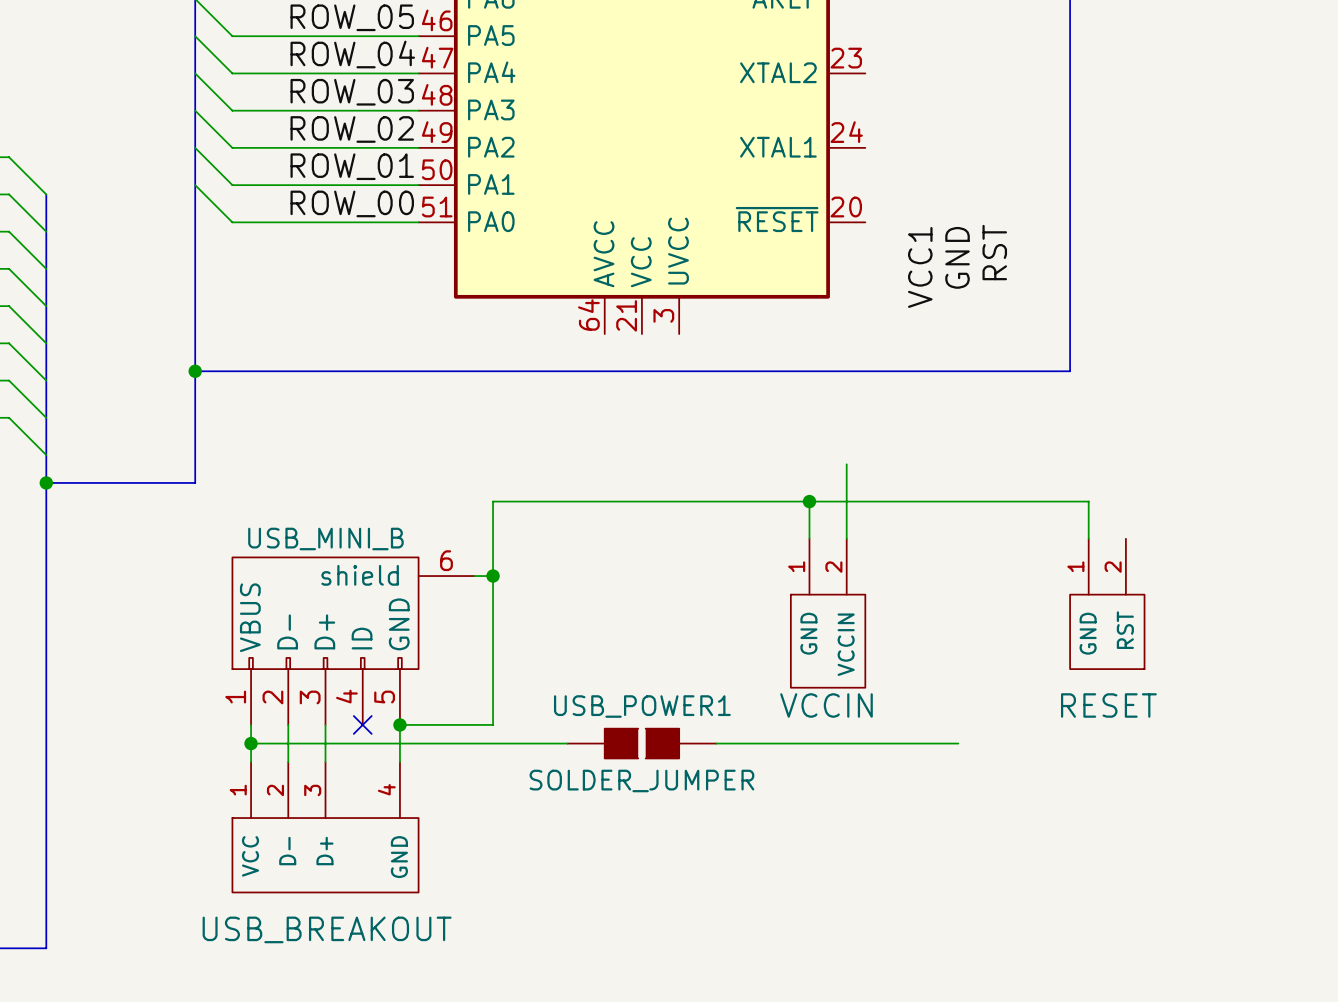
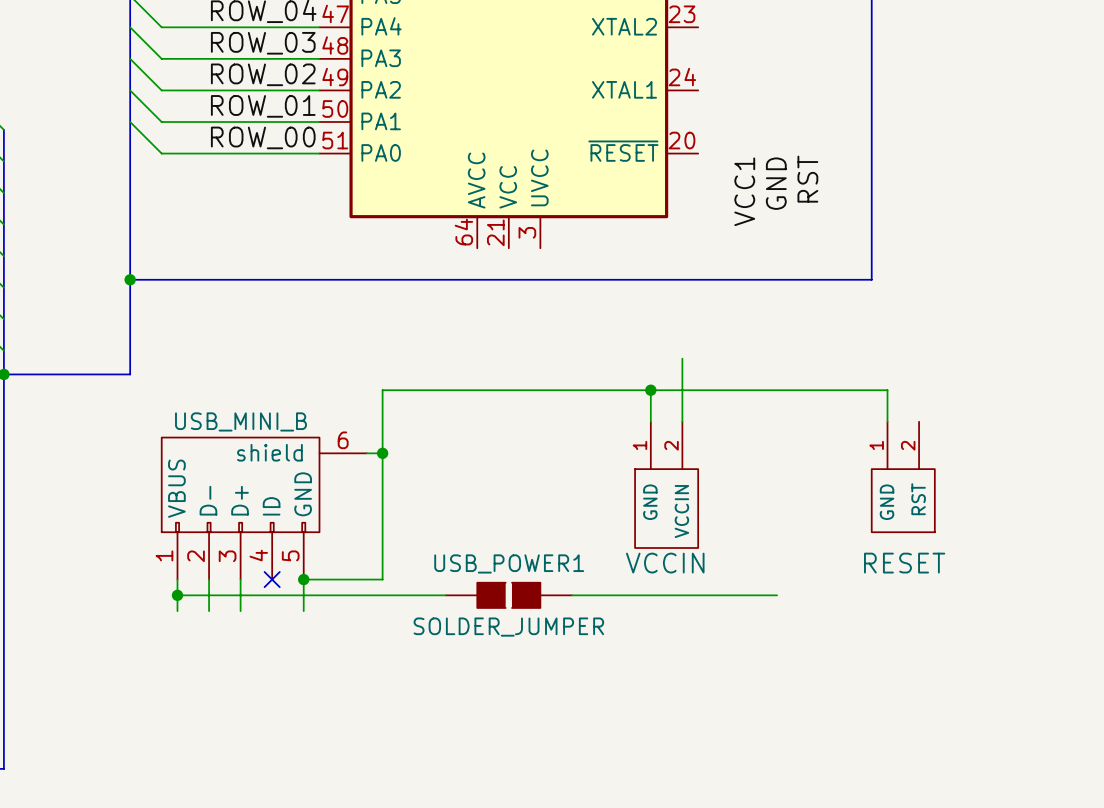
part: USB_BREAKOUT (325, 827) -> none

